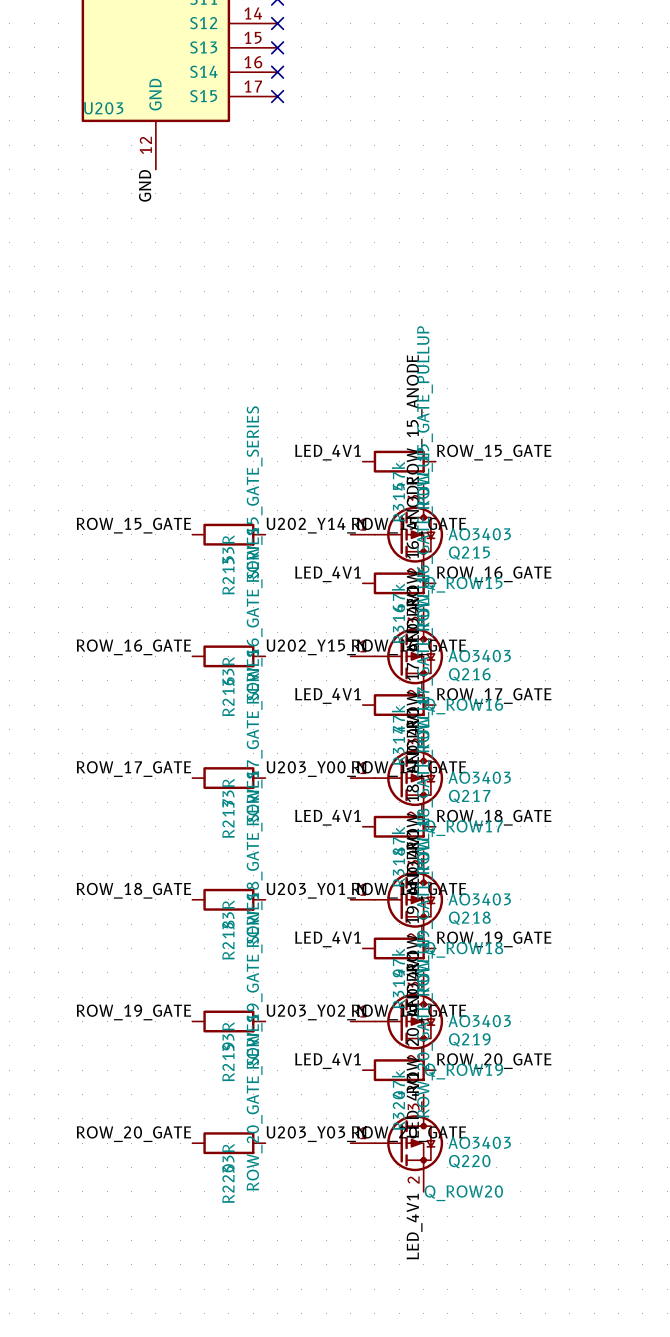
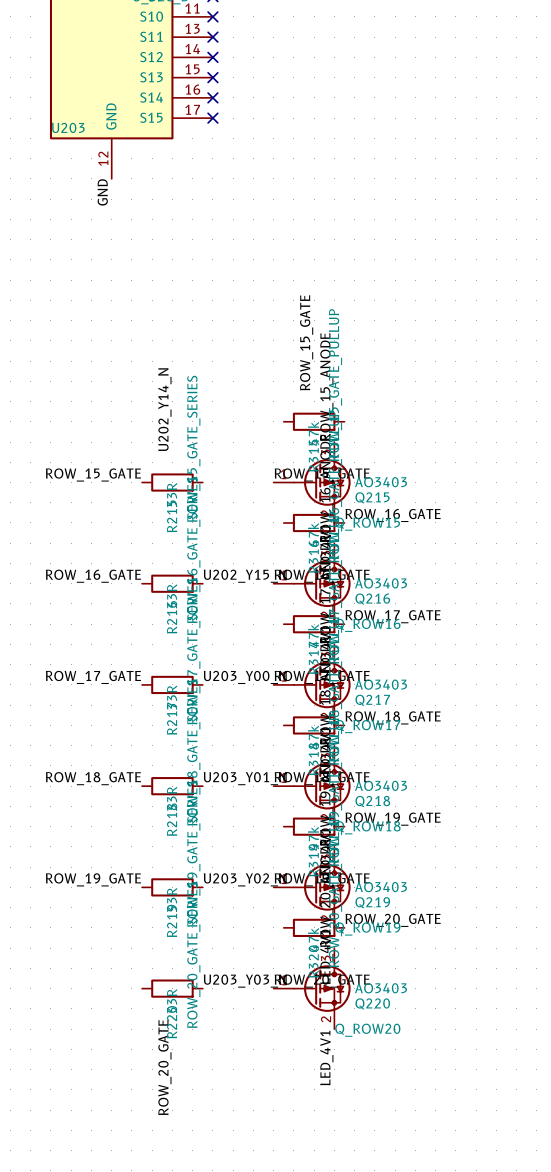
label: LED_4V1 (327, 452) -> none
label rotation: 0° (494, 452) -> 90° counterclockwise (306, 342)
label position: ROW_15_GATE (494, 452) -> ROW_15_GATE (306, 342)
label rotation: 0° (316, 525) -> 90° counterclockwise (164, 409)
label position: U202_Y14_N (316, 525) -> U202_Y14_N (164, 409)
label: LED_4V1 (327, 574) -> none
label: LED_4V1 (327, 696) -> none
label: LED_4V1 (327, 817) -> none
label: LED_4V1 (327, 939) -> none
label: LED_4V1 (327, 1061) -> none
label rotation: 0° (133, 1134) -> 90° counterclockwise (164, 1067)
label position: ROW_20_GATE (133, 1134) -> ROW_20_GATE (164, 1067)

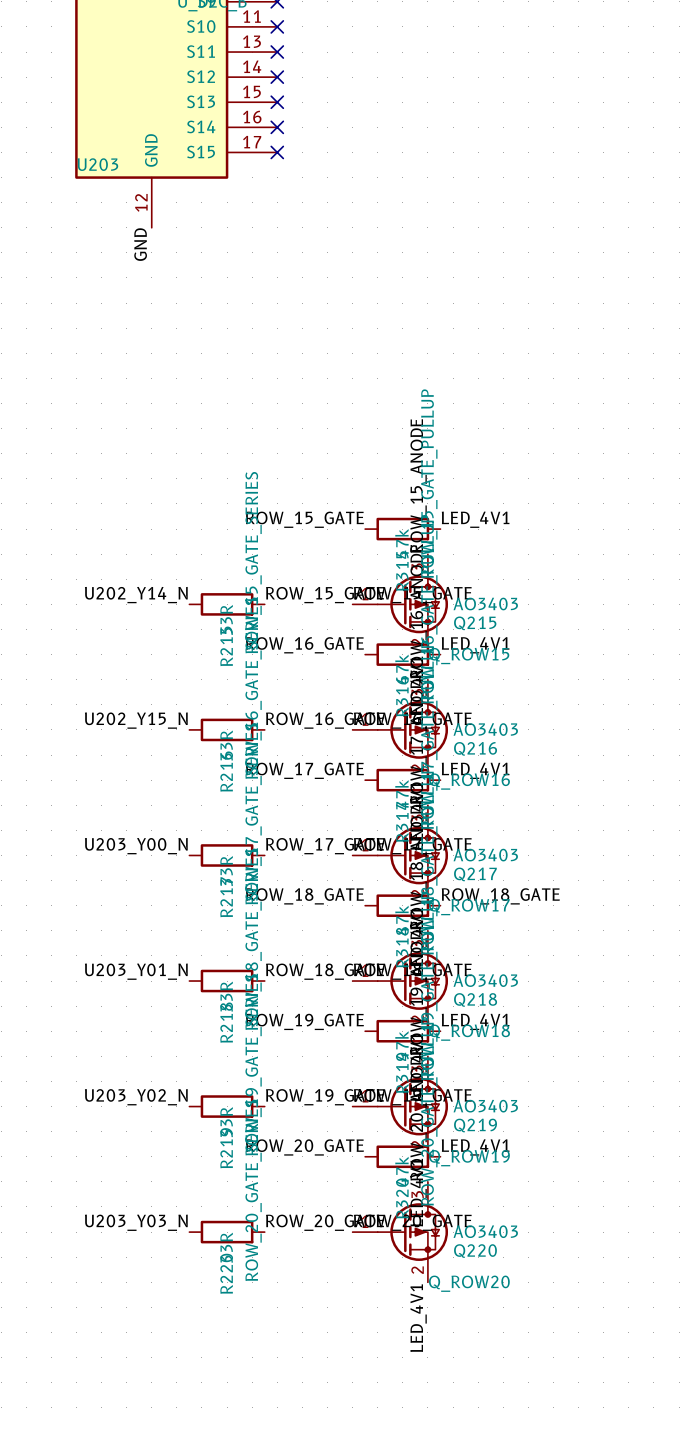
label rotation: 0° (306, 342) -> 90° clockwise (304, 519)
label: U202_Y14_N (164, 409) -> none
label: none -> LED_4V1 (475, 519)
label: ROW_15_GATE (93, 474) -> U202_Y14_N (136, 595)
label: none -> ROW_15_GATE (325, 595)
label: none -> ROW_16_GATE (304, 645)
label: ROW_16_GATE (393, 515) -> LED_4V1 (475, 645)
label: ROW_16_GATE (93, 576) -> U202_Y15_N (136, 720)
label: U202_Y15_N (245, 576) -> ROW_16_GATE (325, 720)
label: none -> ROW_17_GATE (304, 770)
label: ROW_17_GATE (393, 616) -> LED_4V1 (475, 770)
label: ROW_17_GATE (93, 677) -> U203_Y00_N (136, 846)
label: U203_Y00_N (245, 677) -> ROW_17_GATE (325, 846)
label: none -> ROW_18_GATE (304, 896)
label: ROW_18_GATE (93, 778) -> U203_Y01_N (136, 971)
label: U203_Y01_N (245, 778) -> ROW_18_GATE (325, 971)
label: none -> ROW_19_GATE (304, 1021)
label: ROW_19_GATE (393, 819) -> LED_4V1 (475, 1021)
label: ROW_19_GATE (93, 879) -> U203_Y02_N (136, 1097)
label: U203_Y02_N (245, 879) -> ROW_19_GATE (325, 1097)
label: ROW_20_GATE (393, 920) -> LED_4V1 (475, 1147)
label: none -> U203_Y03_N (136, 1222)
label: U203_Y03_N (245, 981) -> ROW_20_GATE (325, 1222)
label rotation: 0° (164, 1067) -> 90° clockwise (304, 1147)
label position: ROW_20_GATE (164, 1067) -> ROW_20_GATE (304, 1147)

